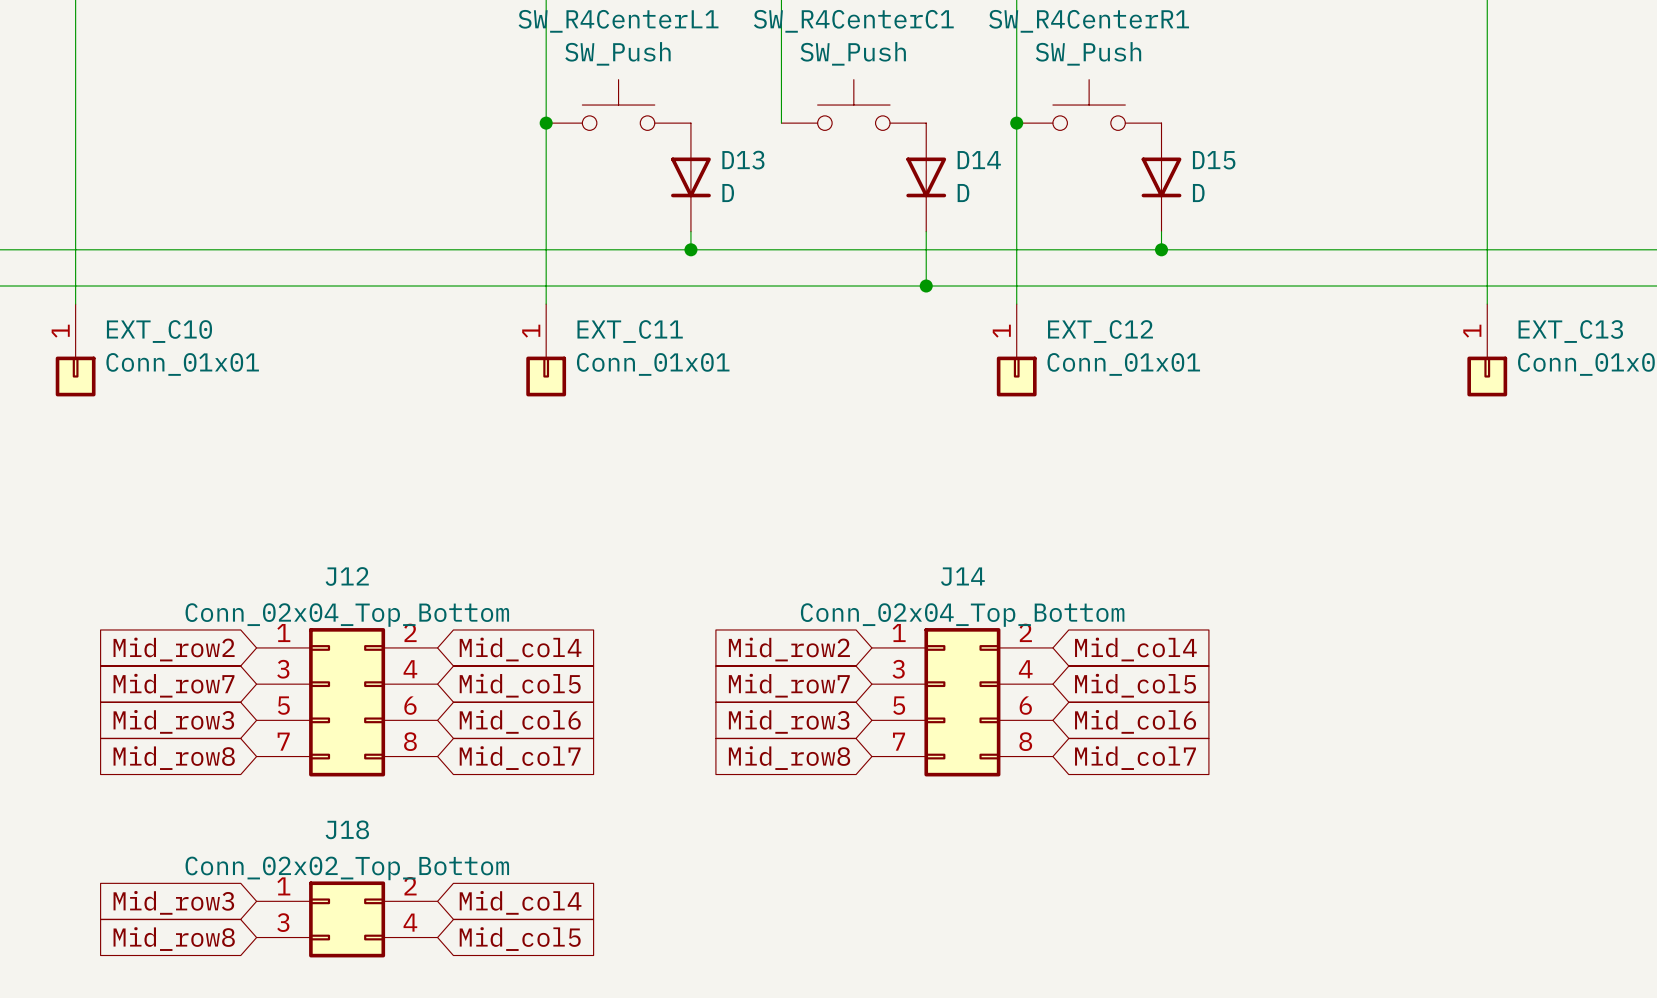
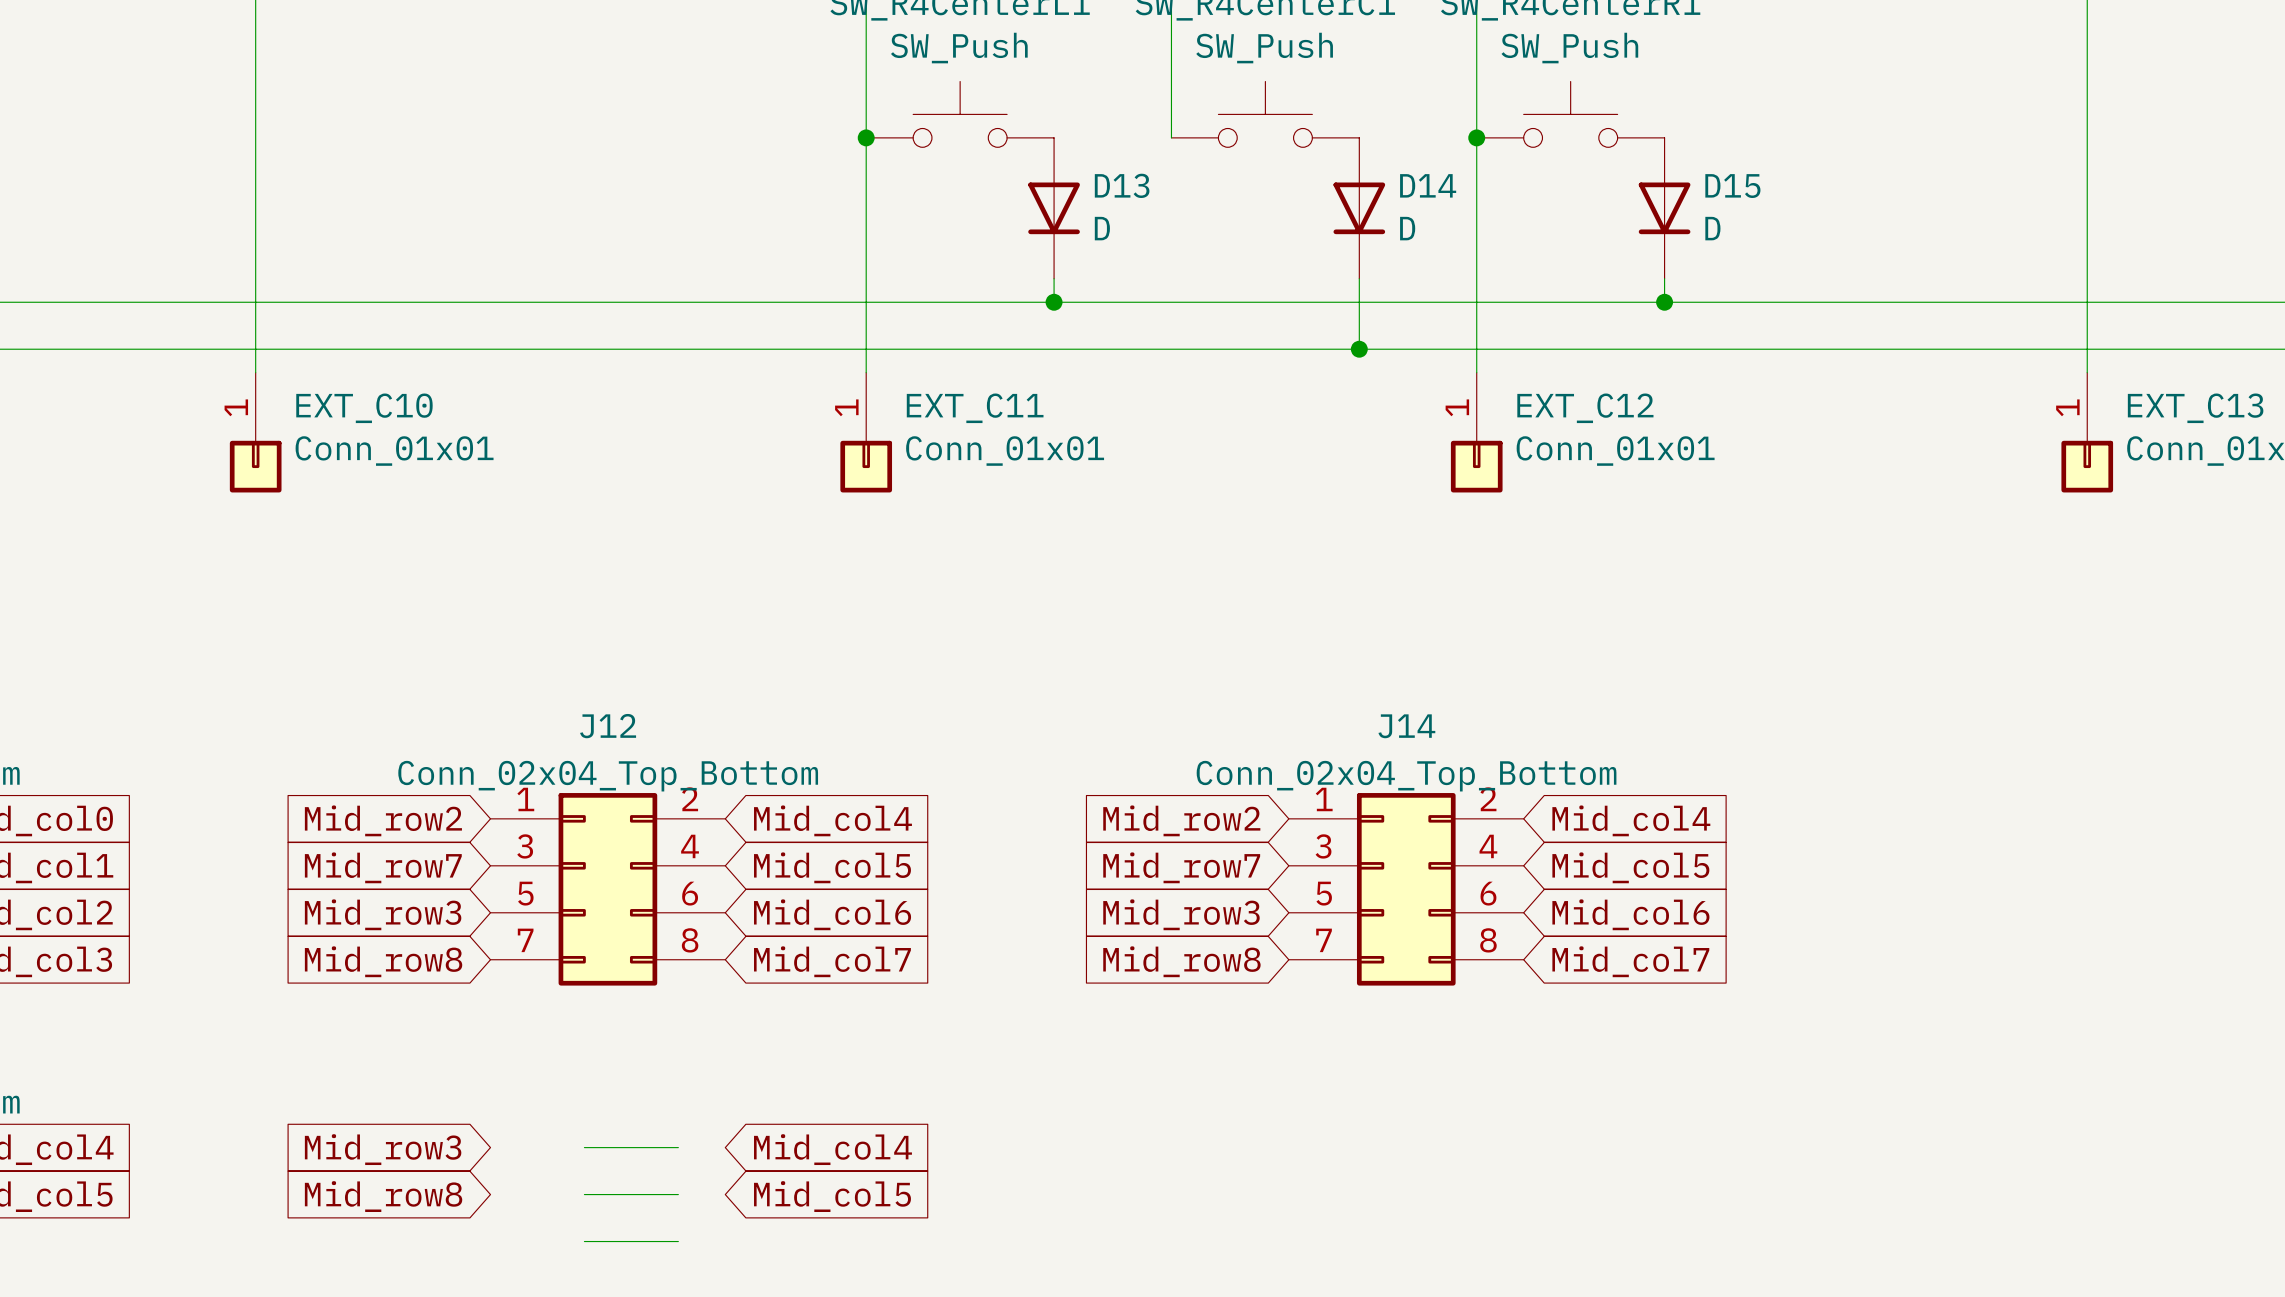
J18: Conn_02x02_Top_Bottom (347, 919) -> none
wire: none -> (584, 1241) (678, 1241)

